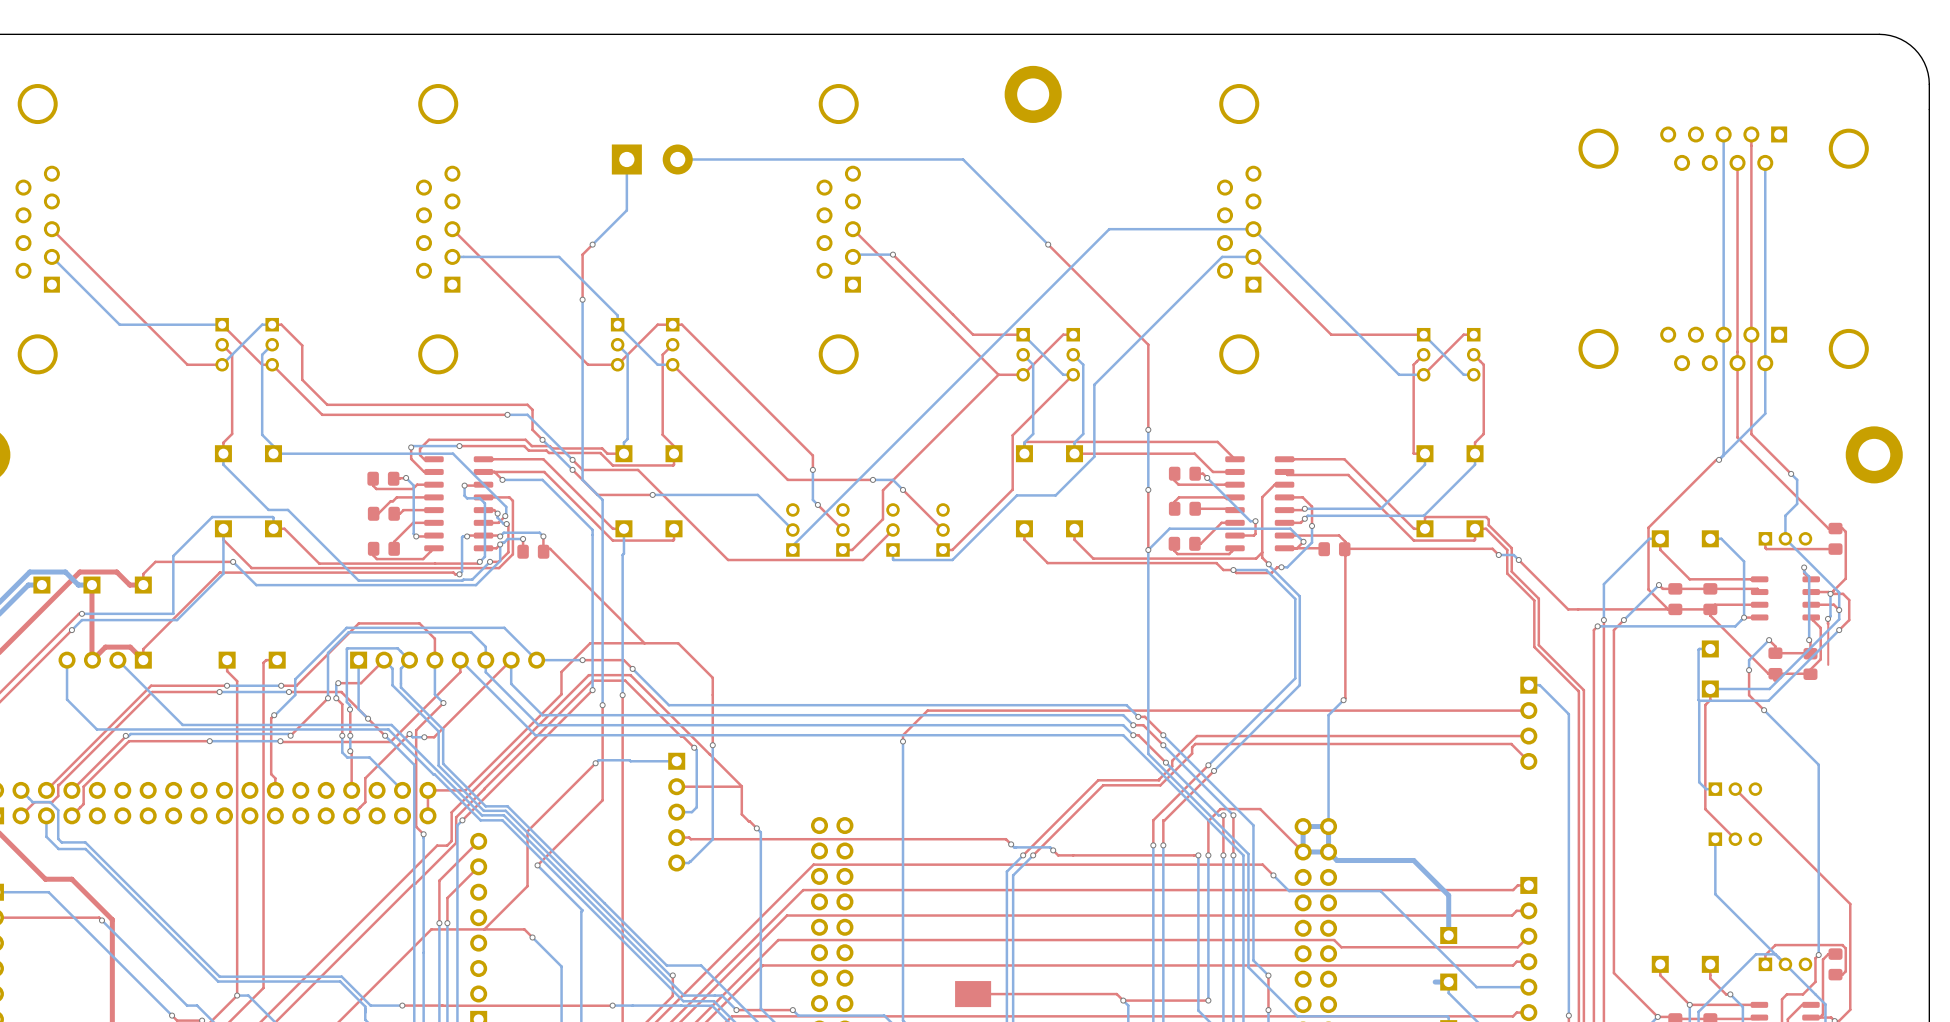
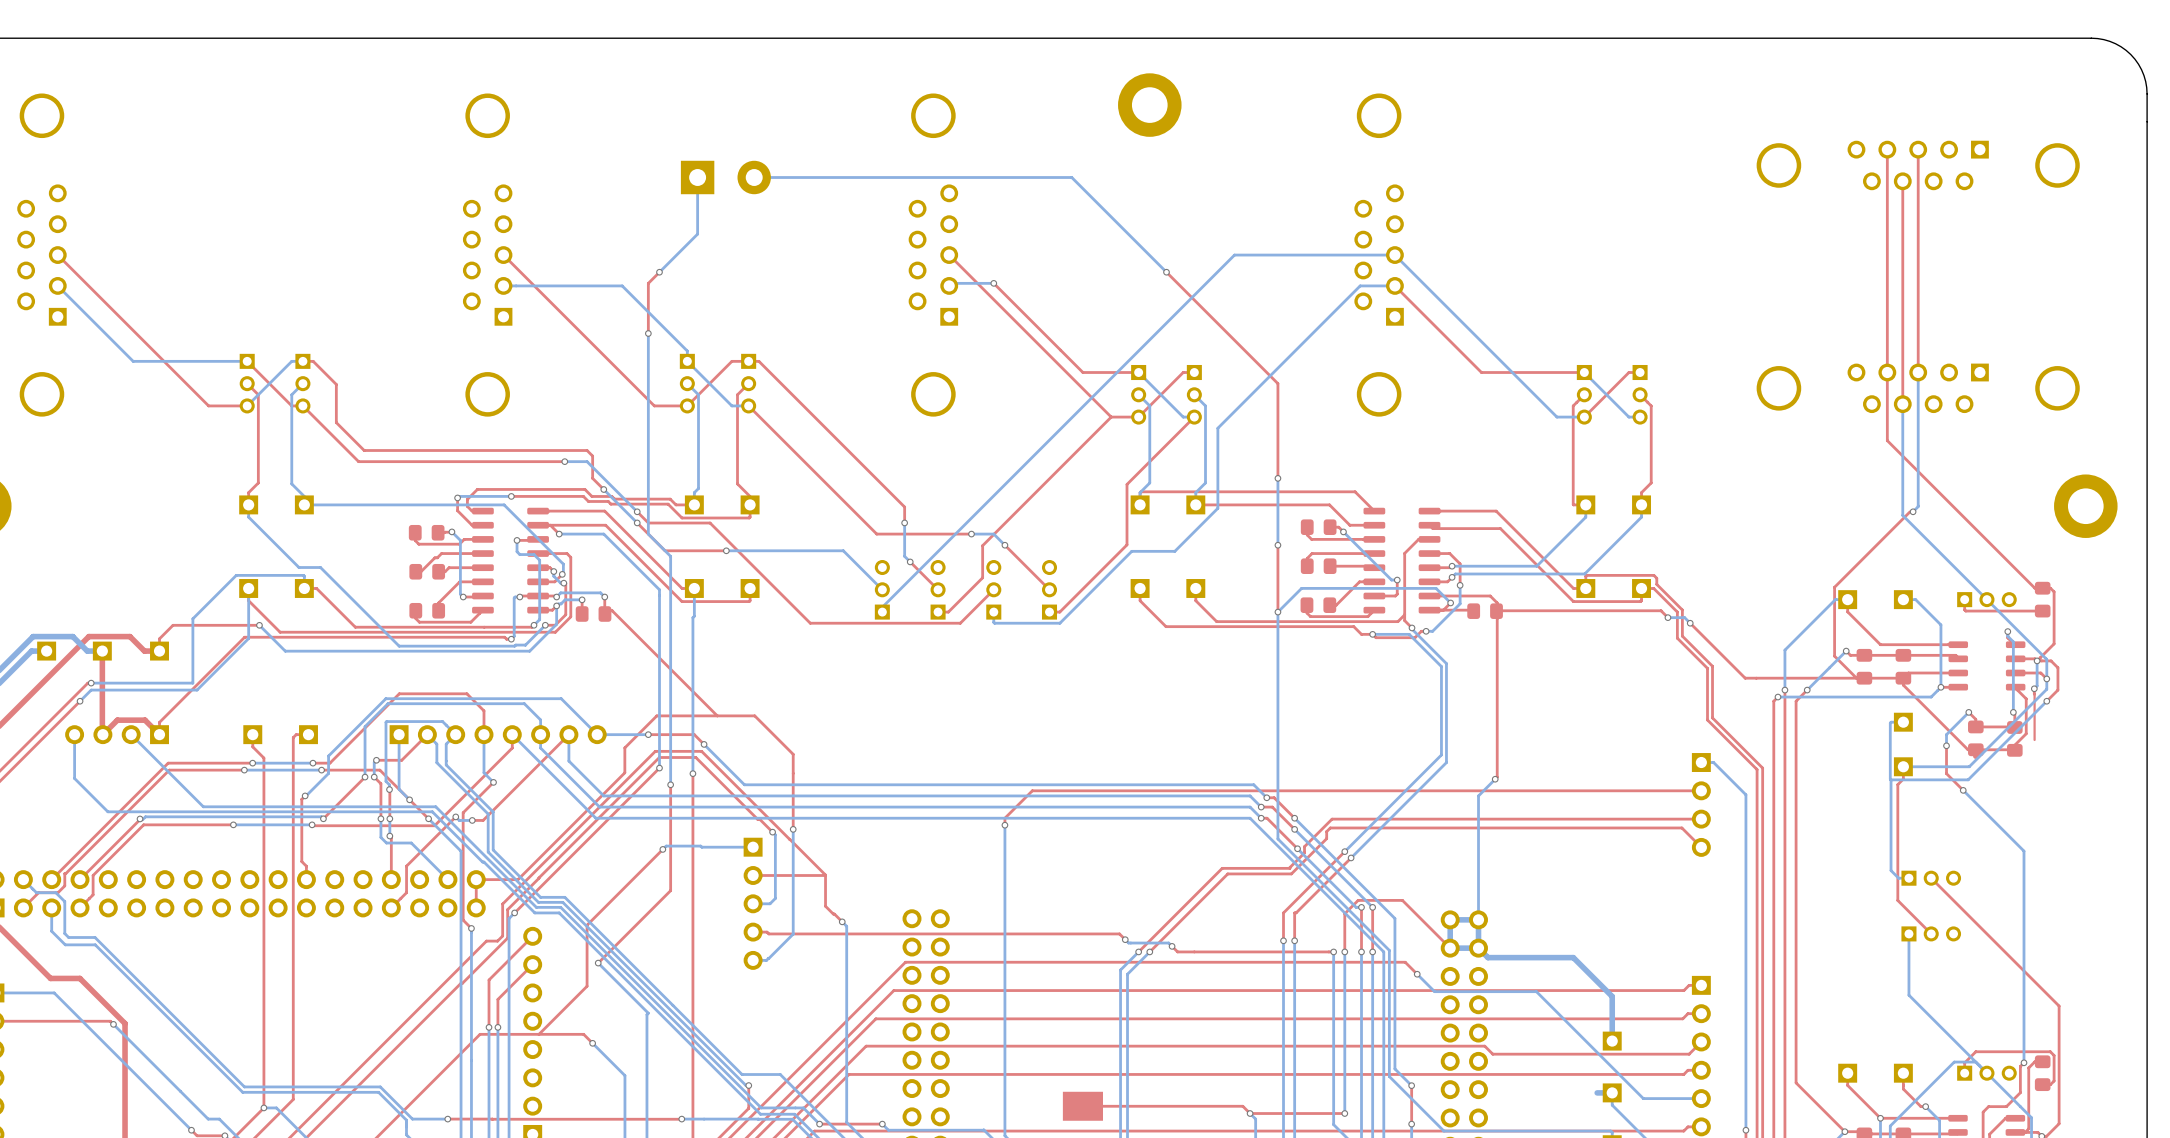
top track: none -> (1918, 149) (1918, 372)
bottom track: (1723, 134) (1723, 334) -> none
top track: (1751, 134) (1751, 434) (1791, 473) -> none
top track: none -> (1902, 181) (1902, 404)
top track: (1737, 162) (1737, 437) -> (1887, 149) (1887, 440) (1933, 486)
bottom track: (1765, 162) (1765, 413) (1723, 455) -> none
bottom track: (1791, 473) (1797, 479) (1797, 503) (1785, 515) (1785, 538) -> (1902, 404) (1902, 515) (1986, 599)
via: (1791, 473) -> none

